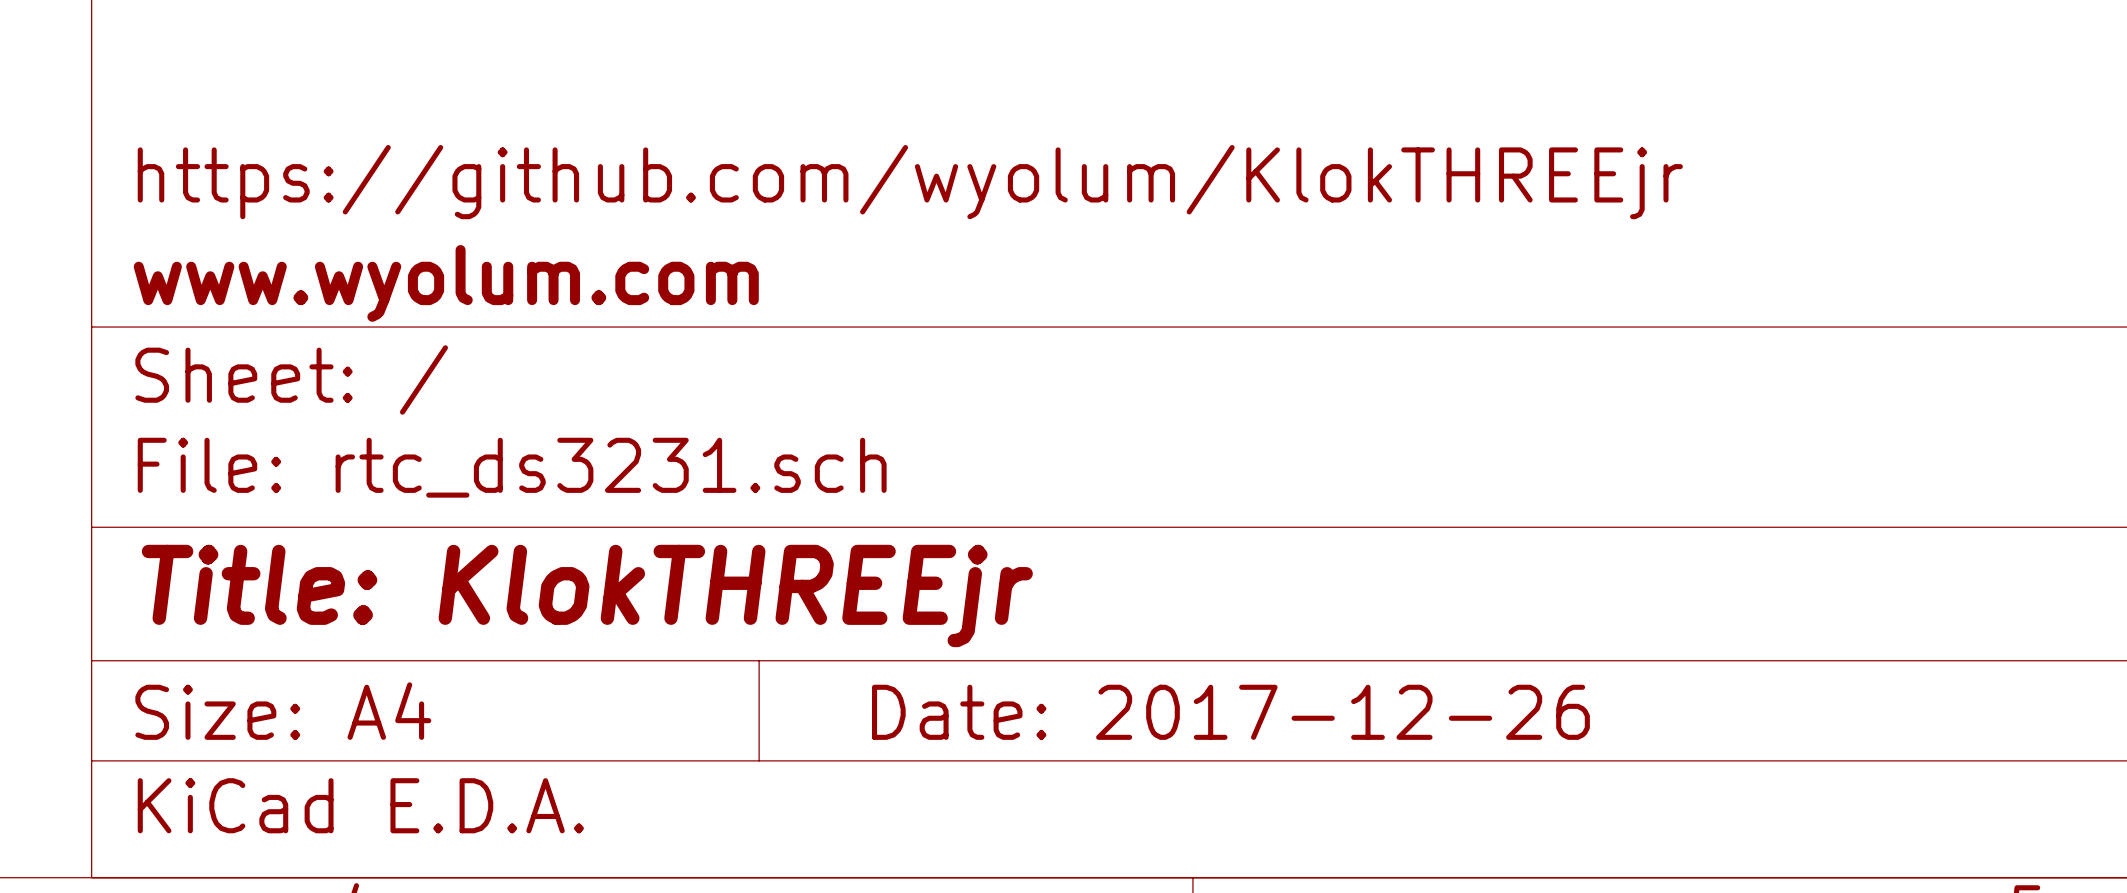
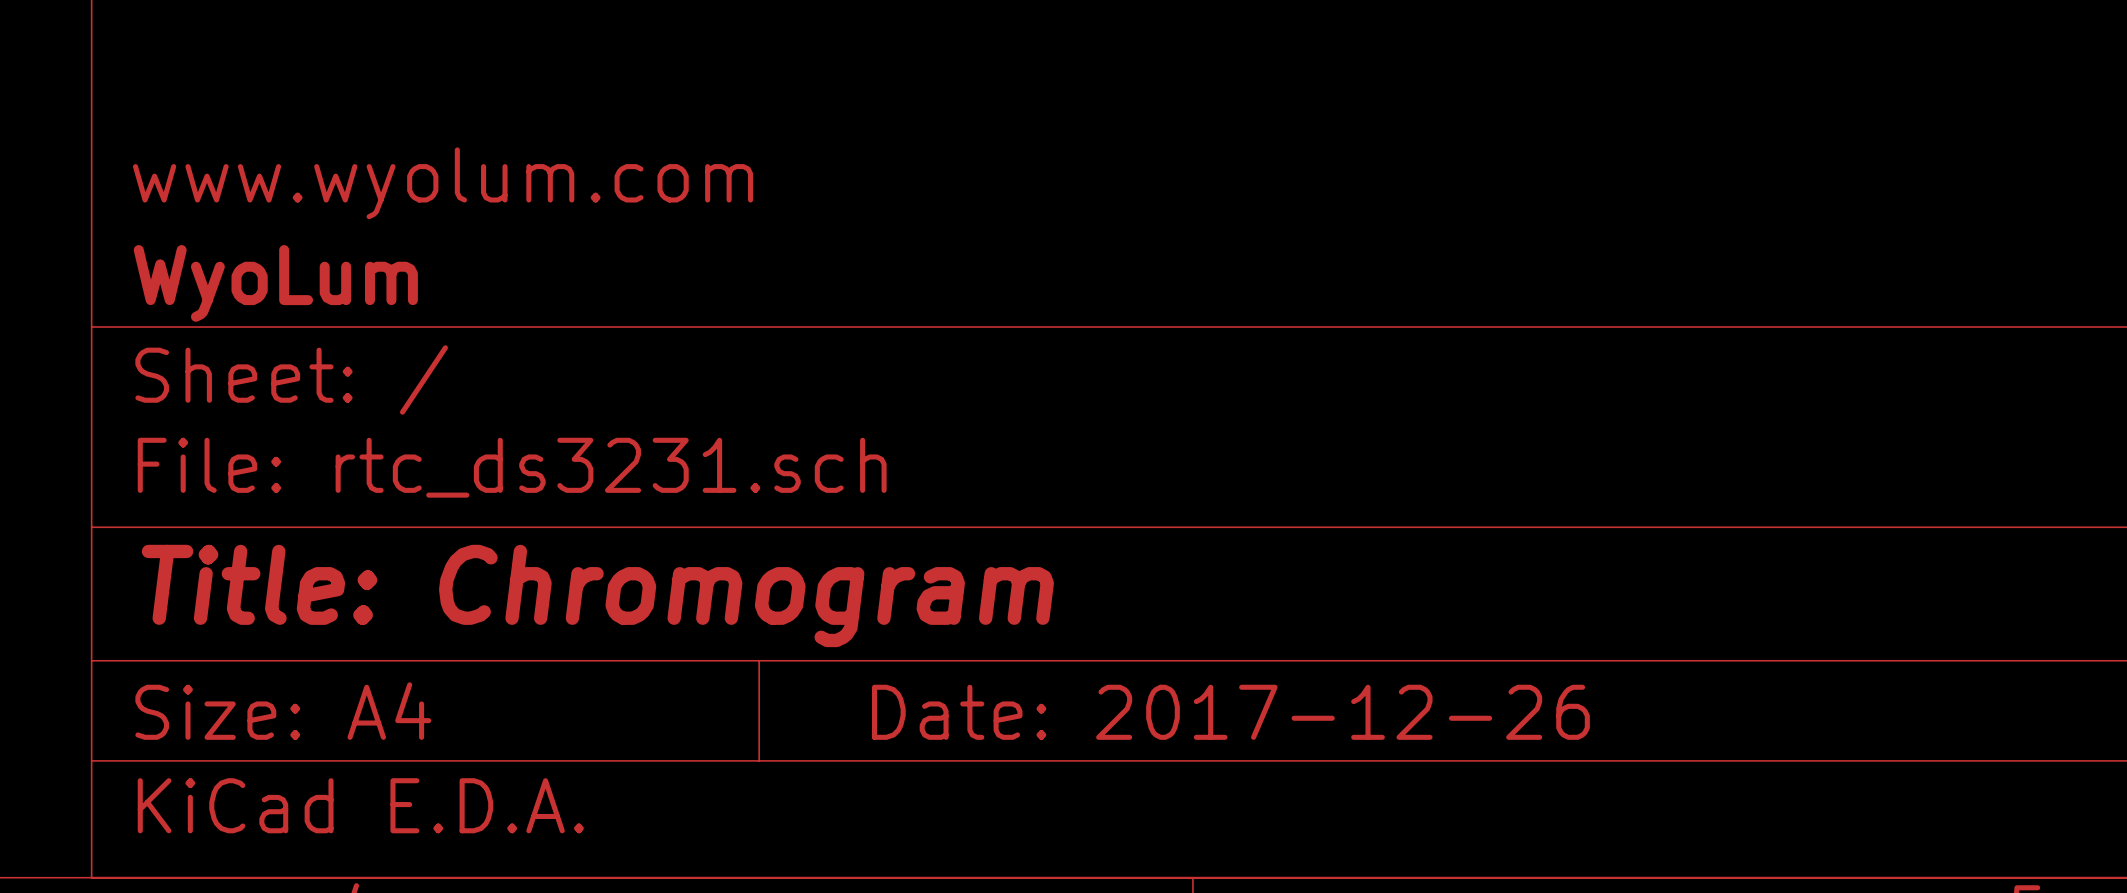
title block: https://github.com/wyolum/KlokTHREEjr (910, 182) -> www.wyolum.com (443, 183)
title block: www.wyolum.com (446, 283) -> WyoLum (275, 283)
title block: Title: KlokTHREEjr (587, 595) -> Title: Chromogram (597, 595)

